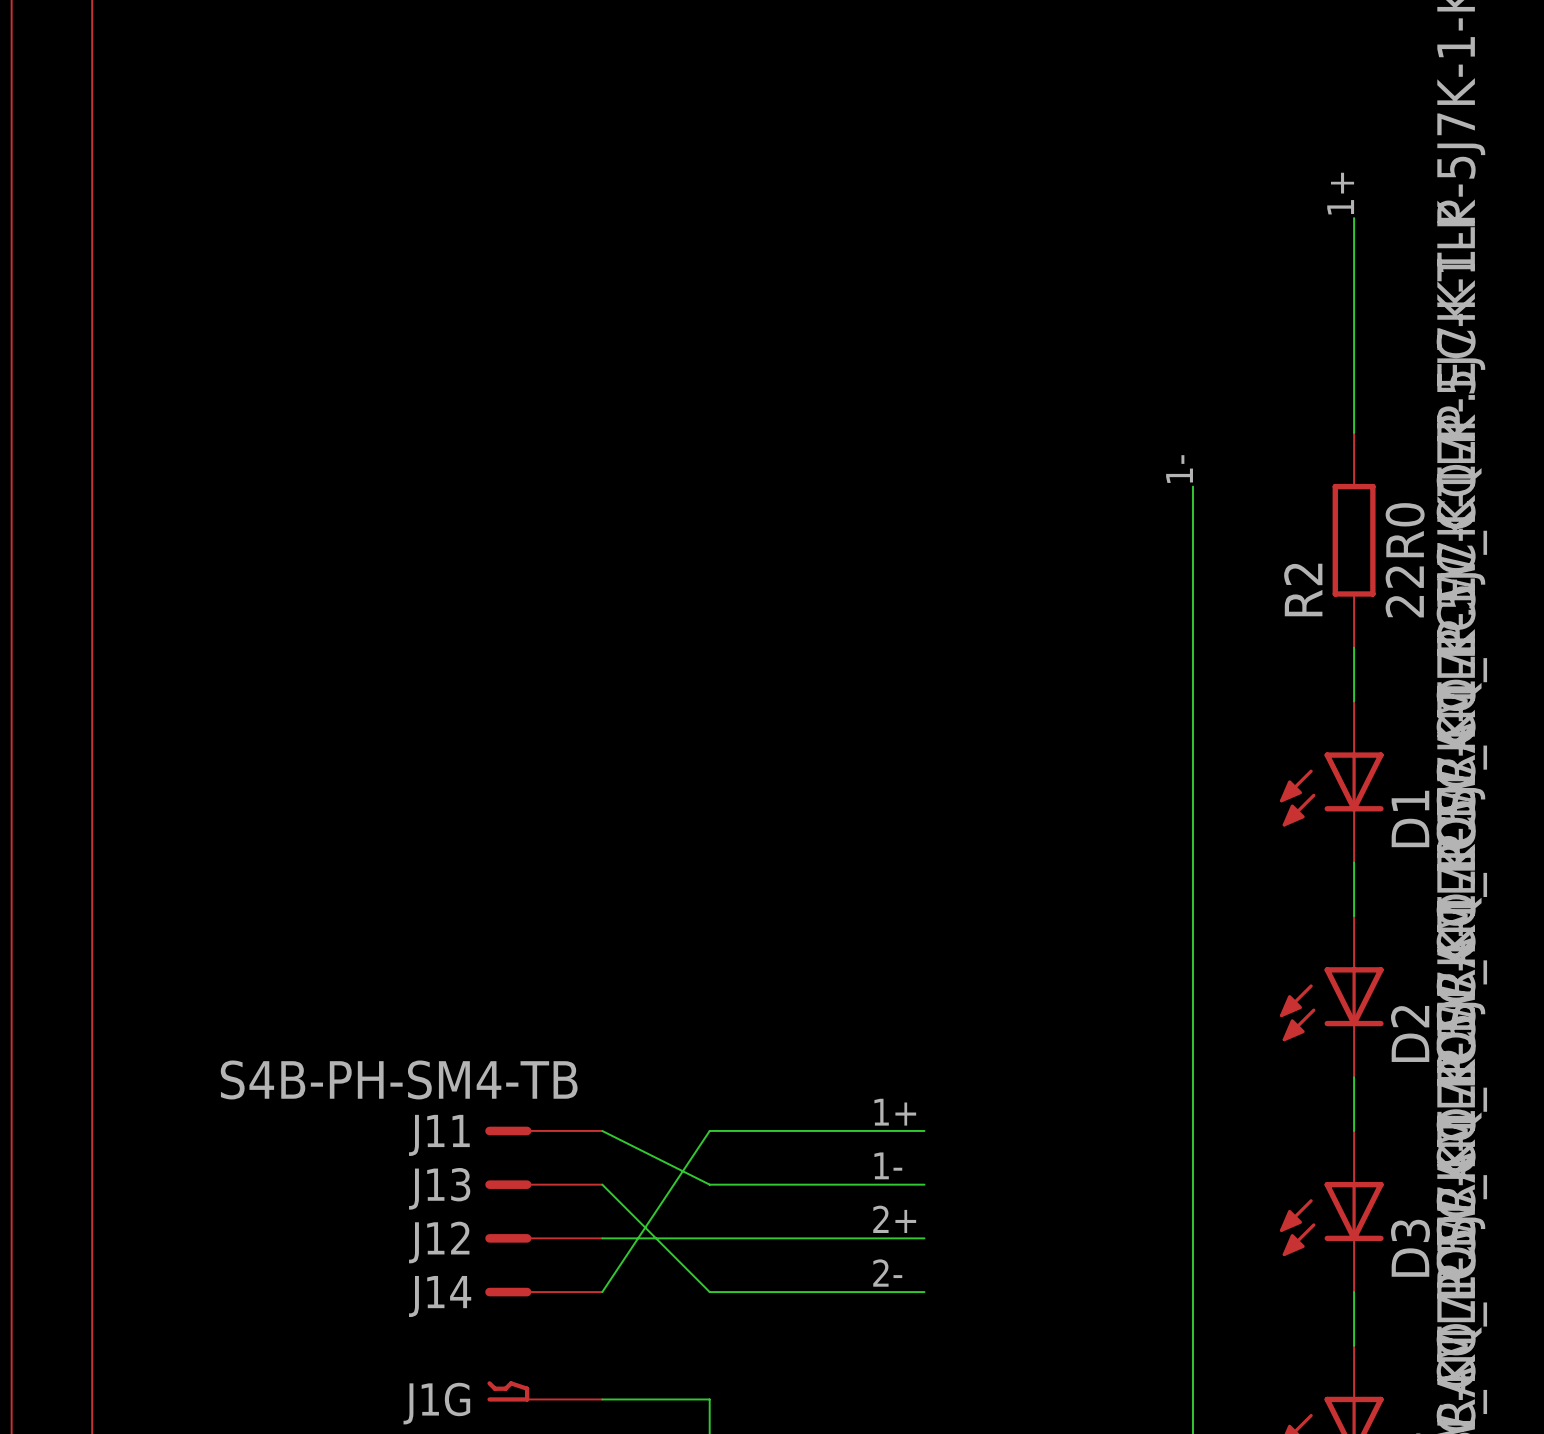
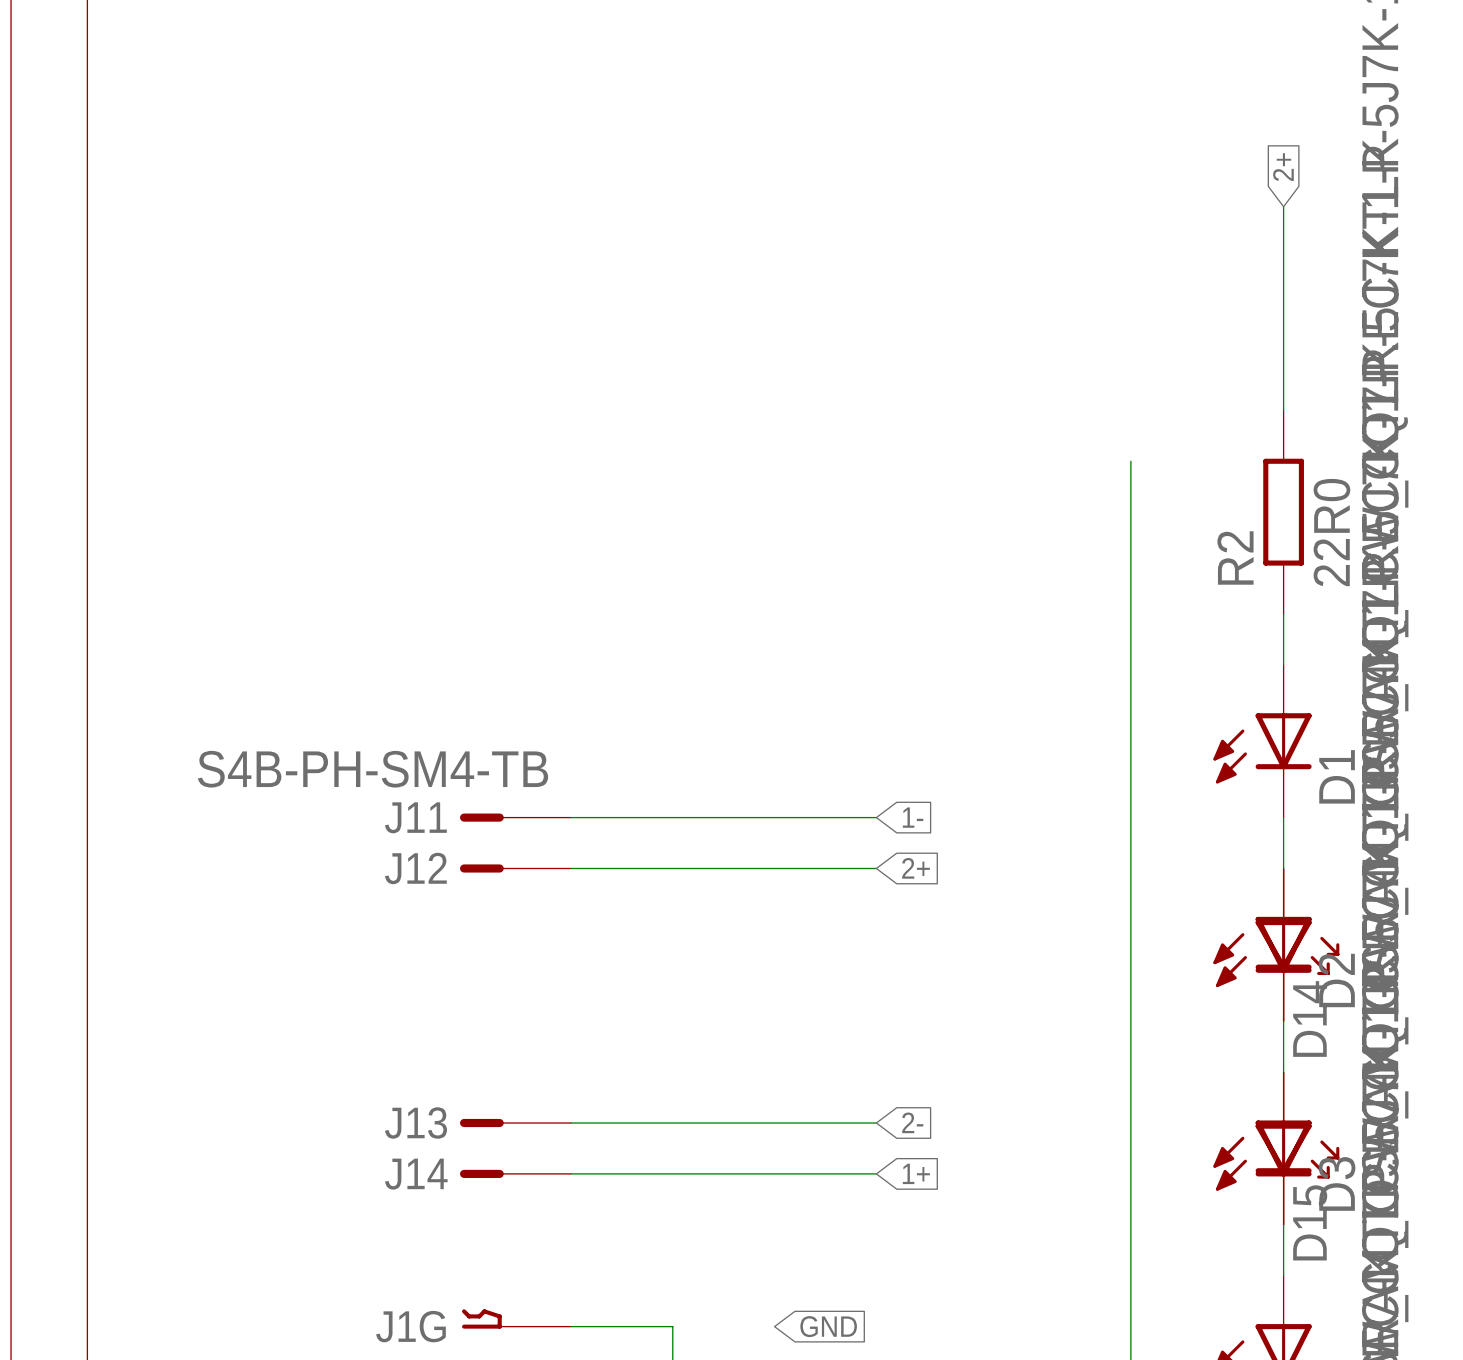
global label: none -> 2+ (1283, 167)
label: 1+ (1340, 193) -> none
label: 1- (1179, 469) -> none
wire: none -> (570, 817) (876, 817)
global label: none -> 1- (913, 817)
global label: none -> 2+ (916, 868)
J12: none -> (515, 868)
wire: none -> (570, 868) (876, 868)
D14: none -> (1297, 944)
label: 1+ (895, 1112) -> none
J11 position: (543, 1130) -> (515, 817)
wire: (602, 1130) (709, 1184) -> (570, 1123) (672, 1123)
wire: (924, 1130) (709, 1130) (602, 1292) -> none
label: 1- (888, 1165) -> none
wire: (602, 1184) (709, 1292) (924, 1292) -> none
global label: none -> 2- (912, 1122)
D15: none -> (1297, 1148)
label: 2+ (894, 1219) -> none
global label: none -> 1+ (916, 1173)
J12 name: J12 (439, 1242) -> J14 (416, 1174)
label: 2- (887, 1273) -> none
J14: (543, 1292) -> none
global label: none -> GND (828, 1326)

